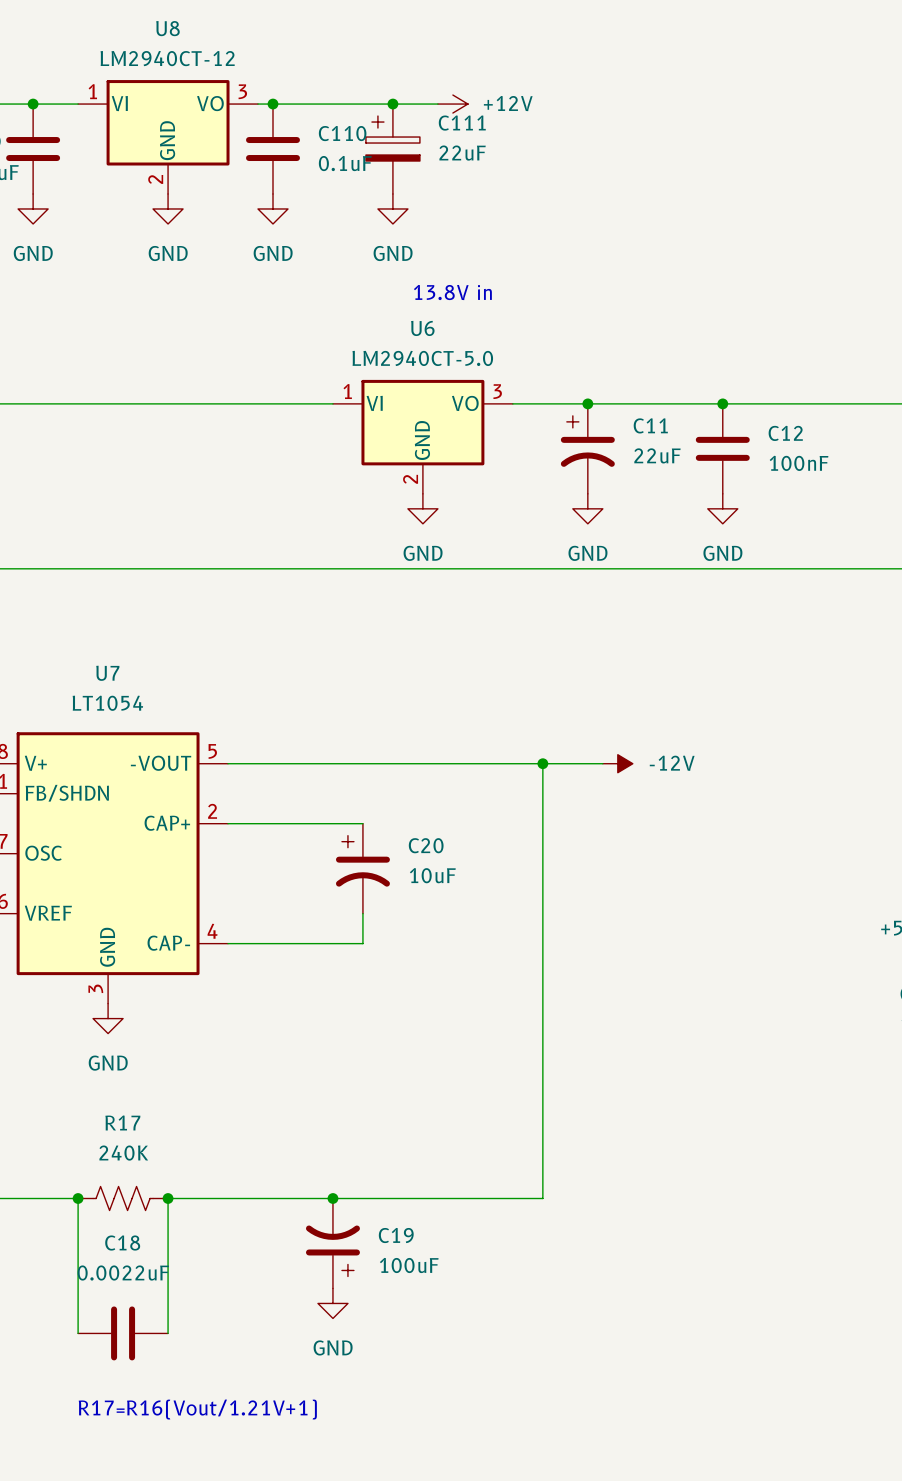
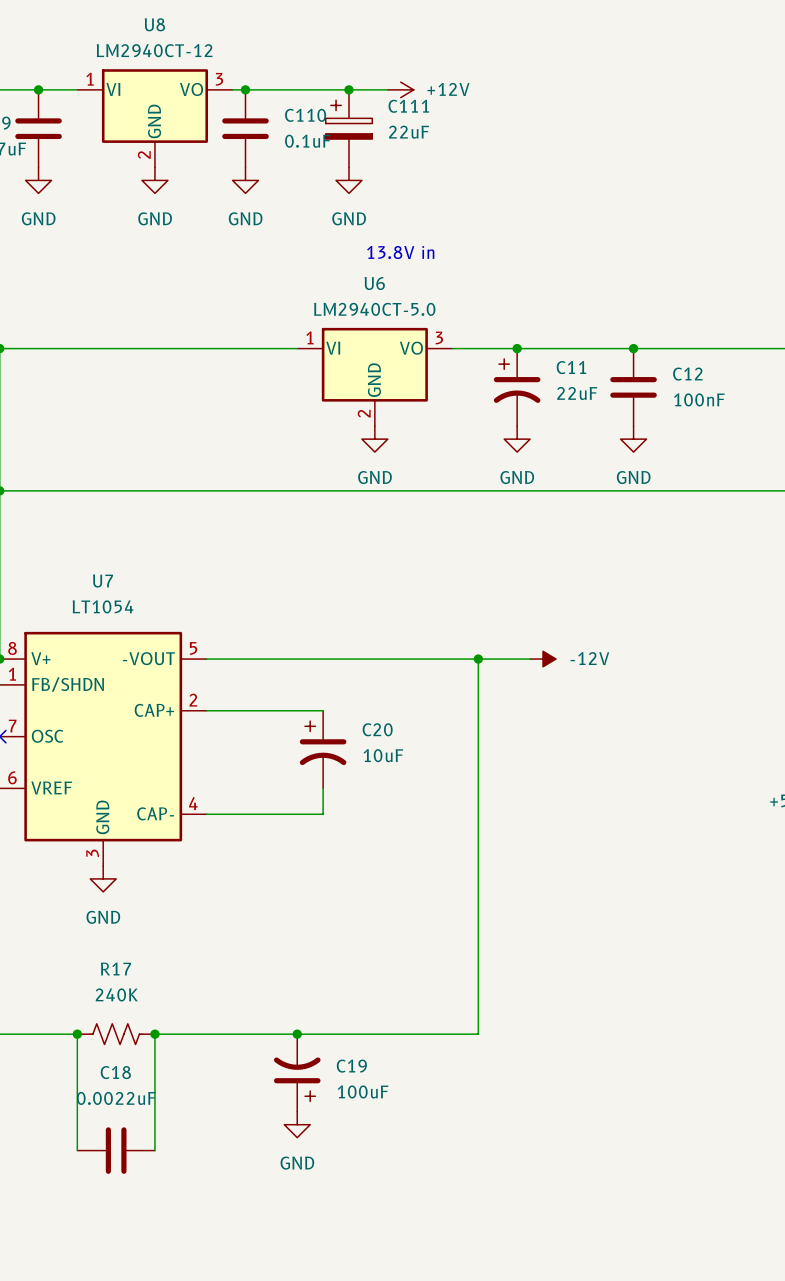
text: R17=R16(Vout/1.21V+1) (197, 1409) -> none

